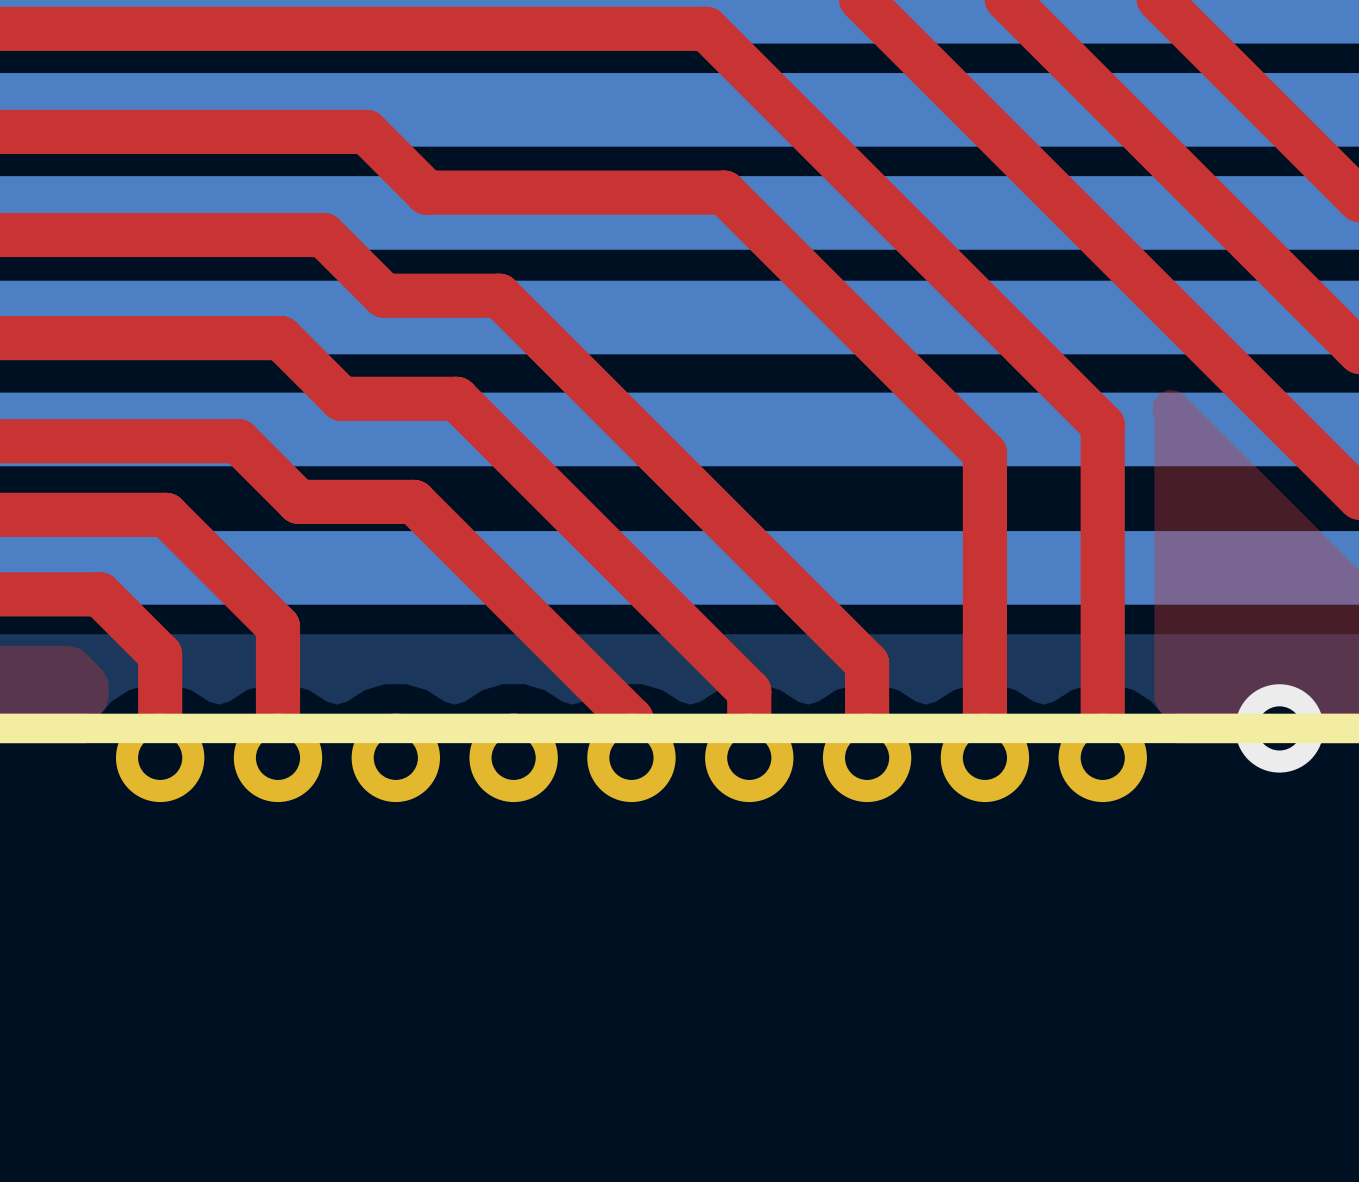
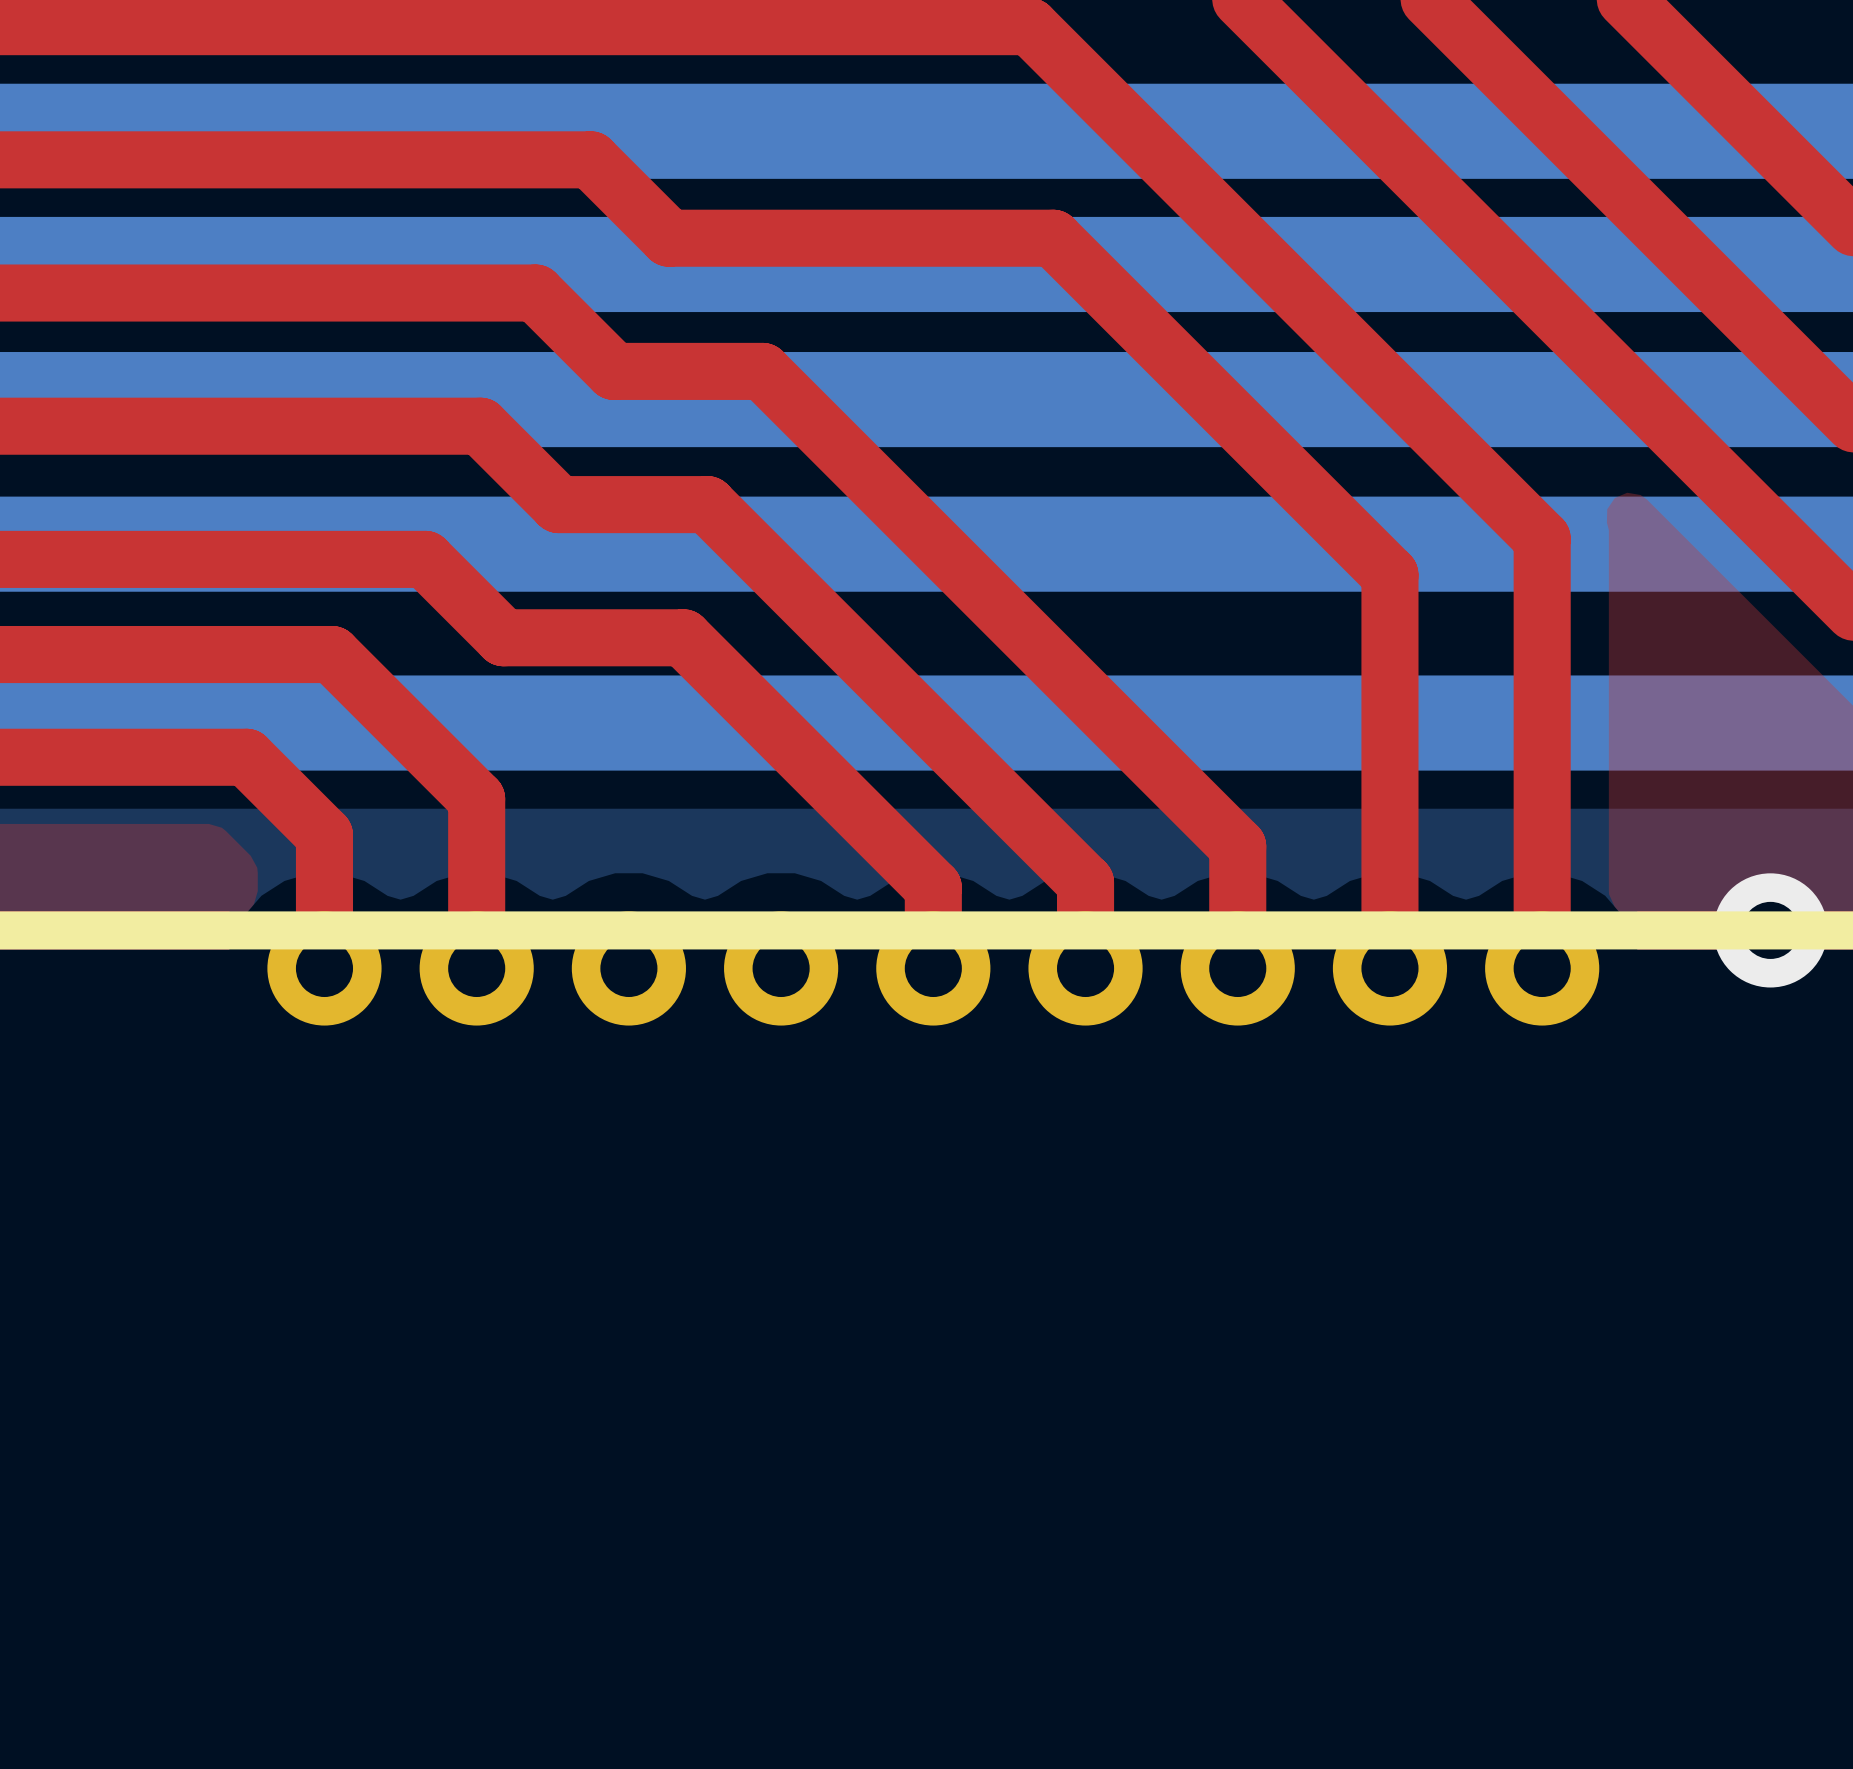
top track: (413, 501) (631, 719) -> (652, 637) (683, 637) (933, 887) (933, 918)

